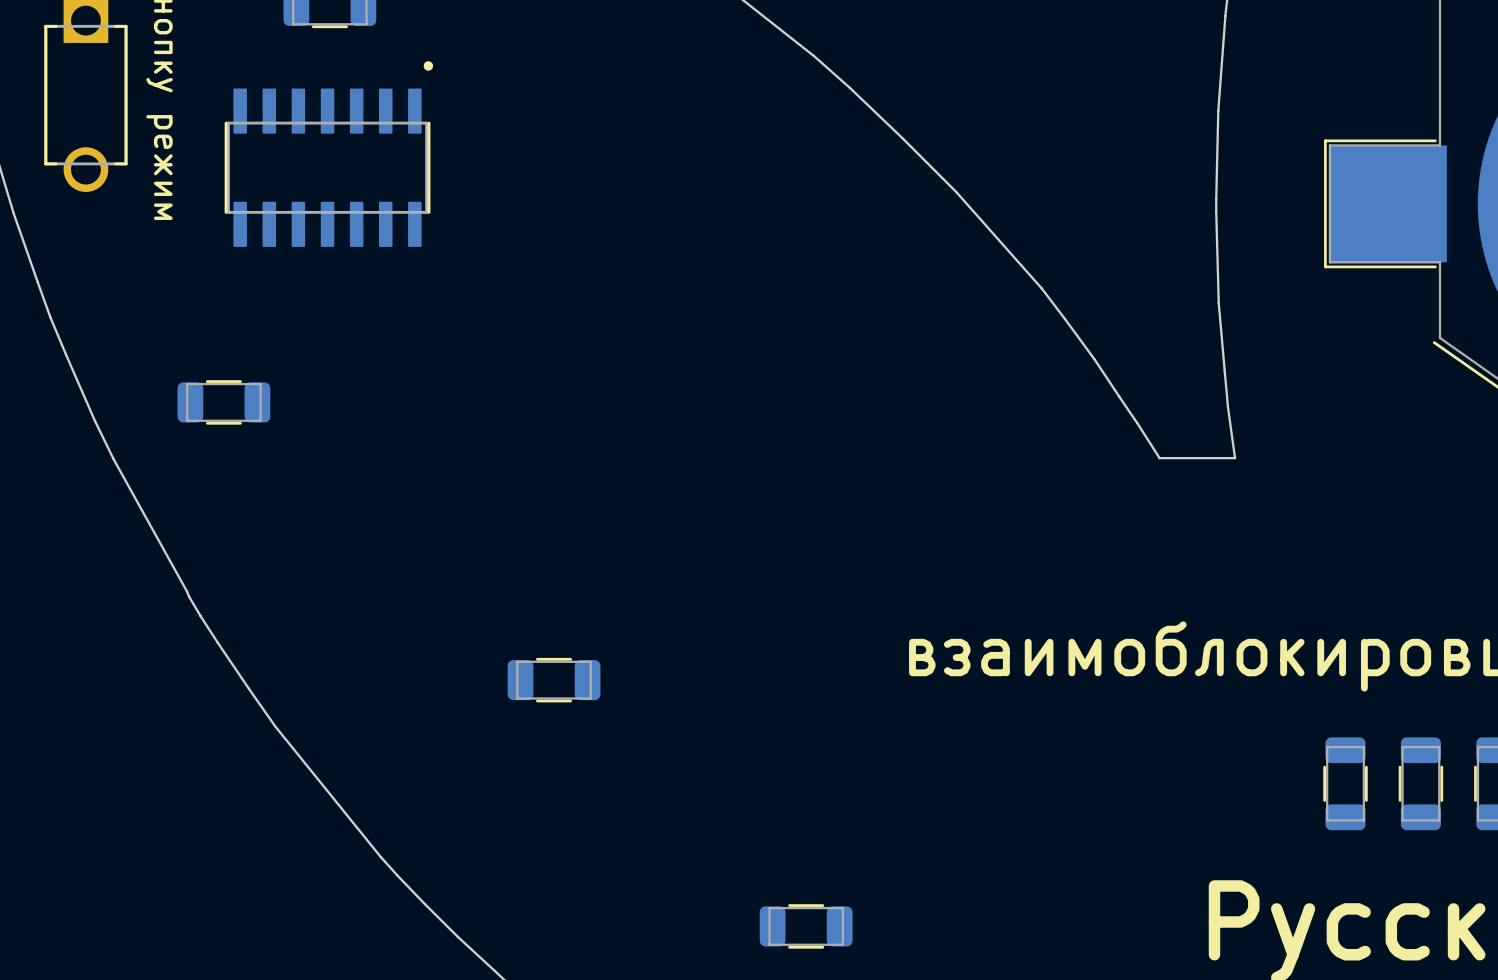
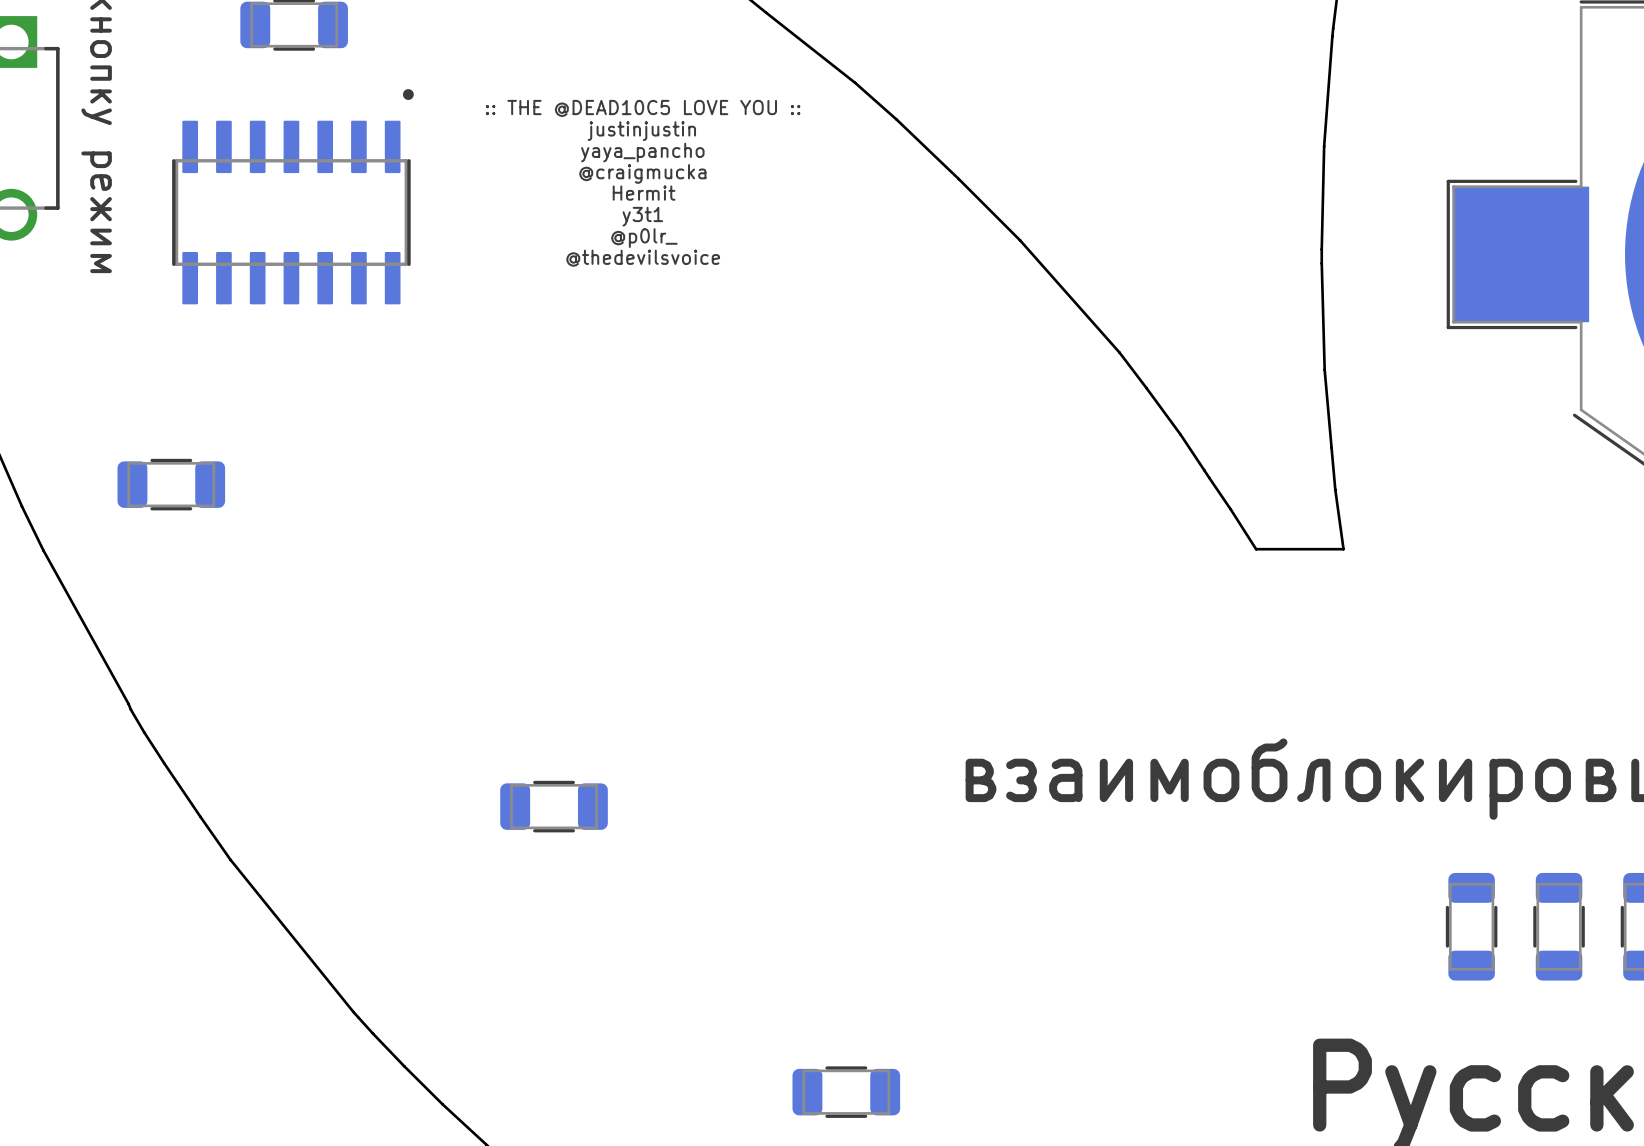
text: none -> :: THE @DEAD10C5 LOVE YOU :: (643, 108)
text: none -> justinjustin (641, 131)
text: none -> yaya_pancho (642, 152)
text: none -> @craigmucka (642, 173)
text: none -> Hermit (644, 193)
text: none -> y3t1 (642, 216)
text: none -> @p0lr_ (644, 238)
text: none -> @thedevilsvoice (643, 258)

